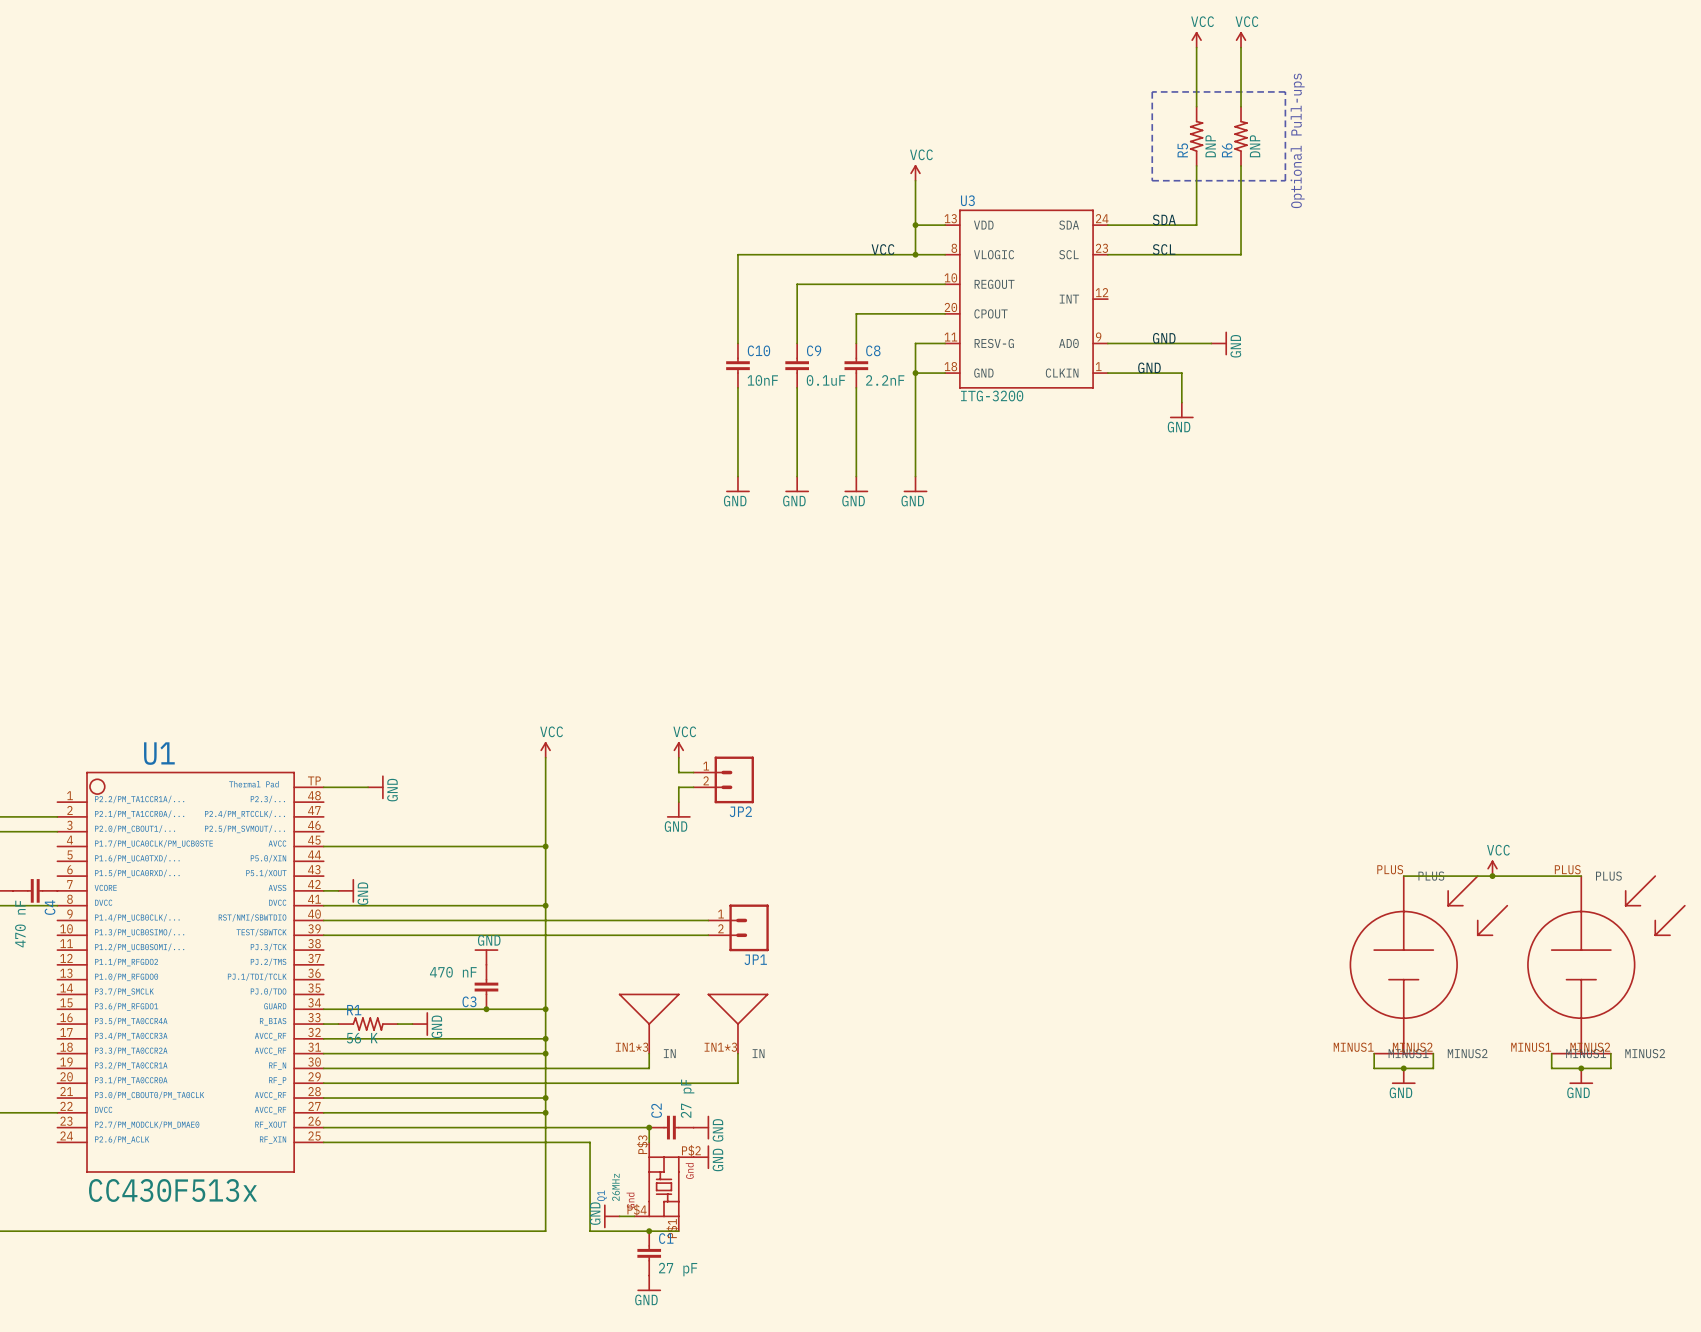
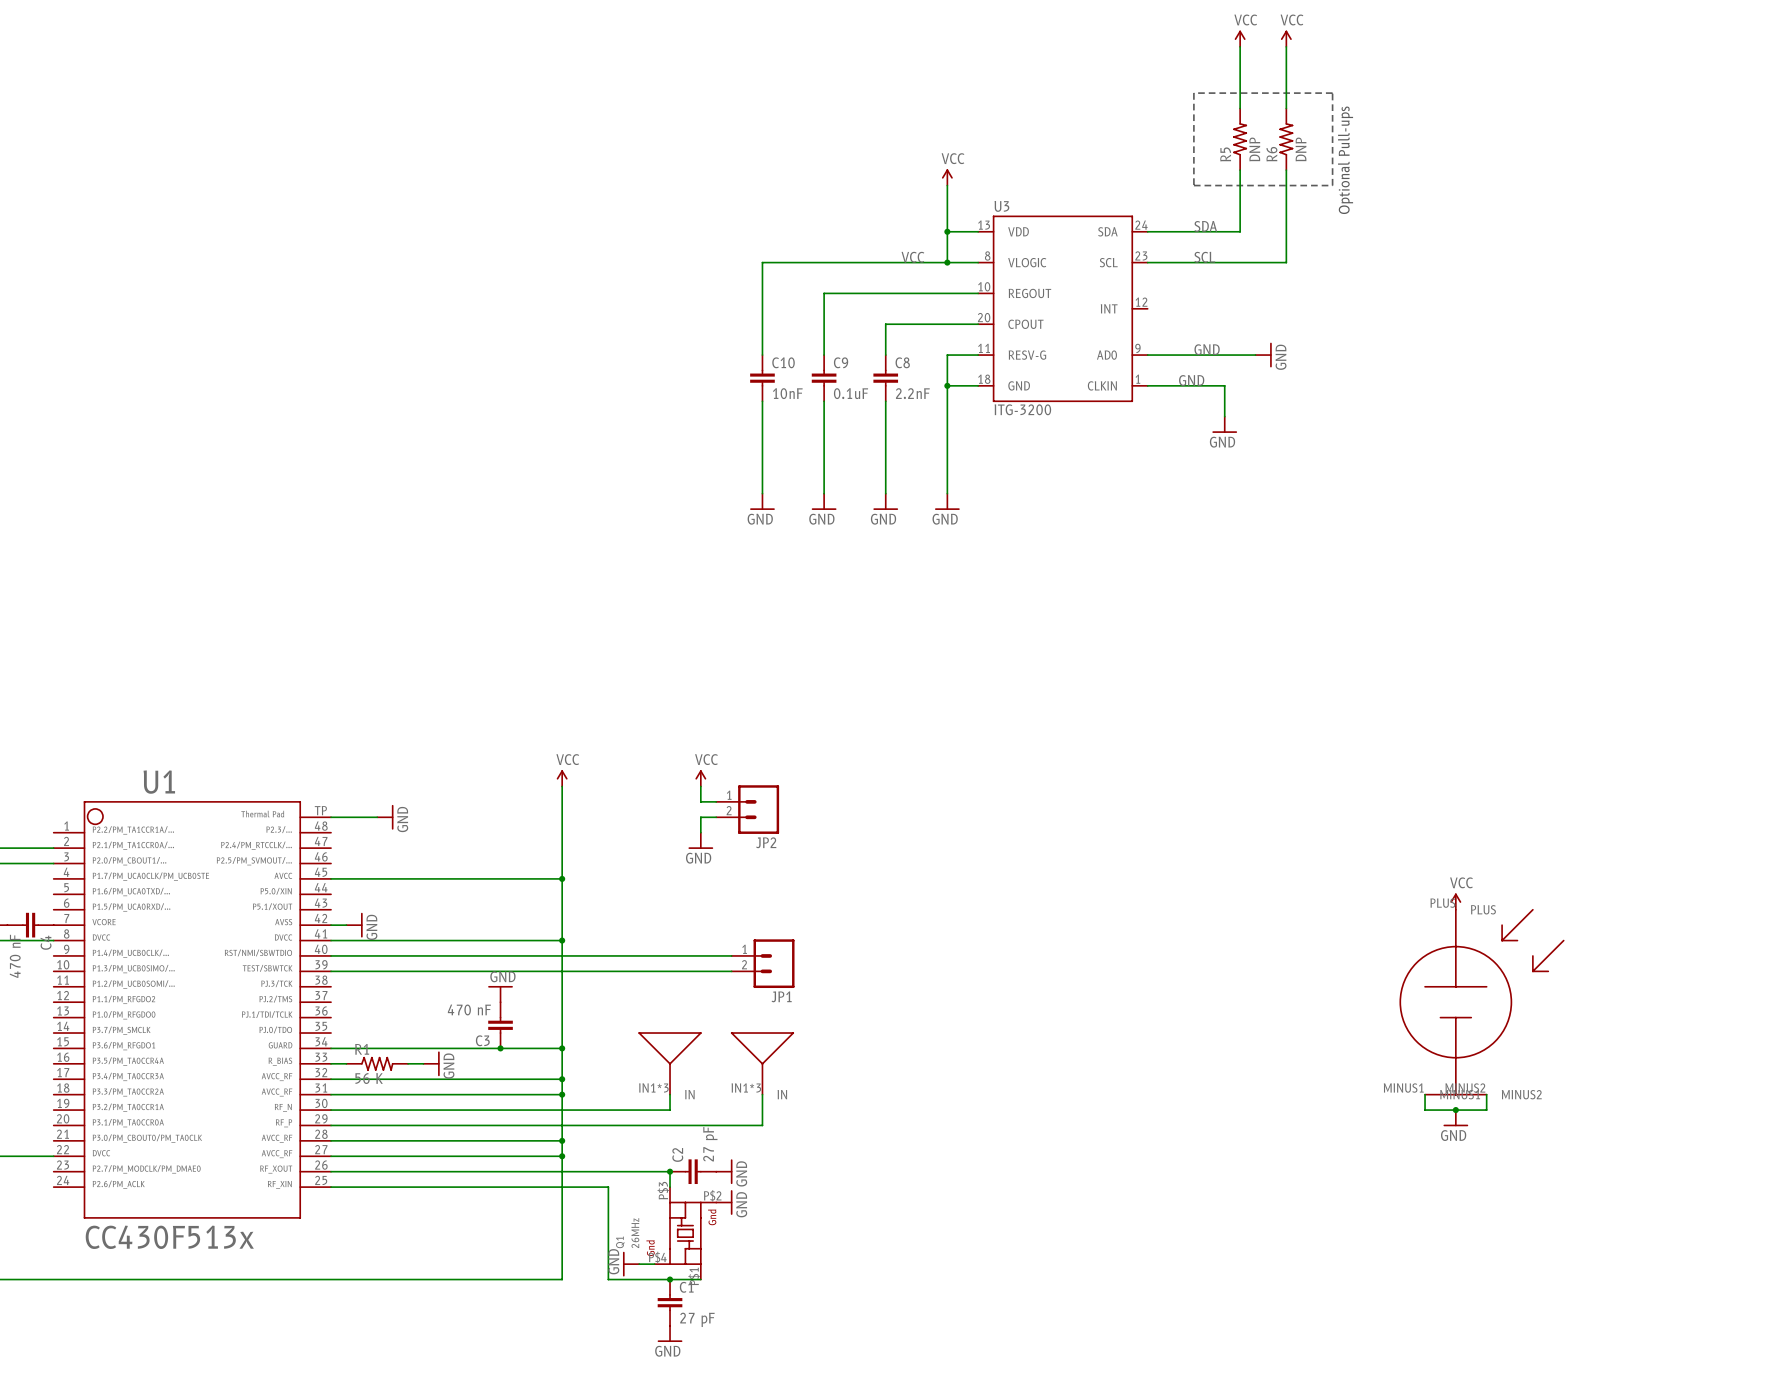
power symbol position: VCC (1492, 868) -> VCC (1455, 901)
wire: (1403, 876) (1581, 876) -> none
junction: (1492, 876) -> none
part: (1606, 964) -> none
wire: (1551, 1053) (1551, 1068) (1610, 1068) (1610, 1053) -> none
junction: (1581, 1068) -> none
power symbol: GND (1581, 1076) -> none

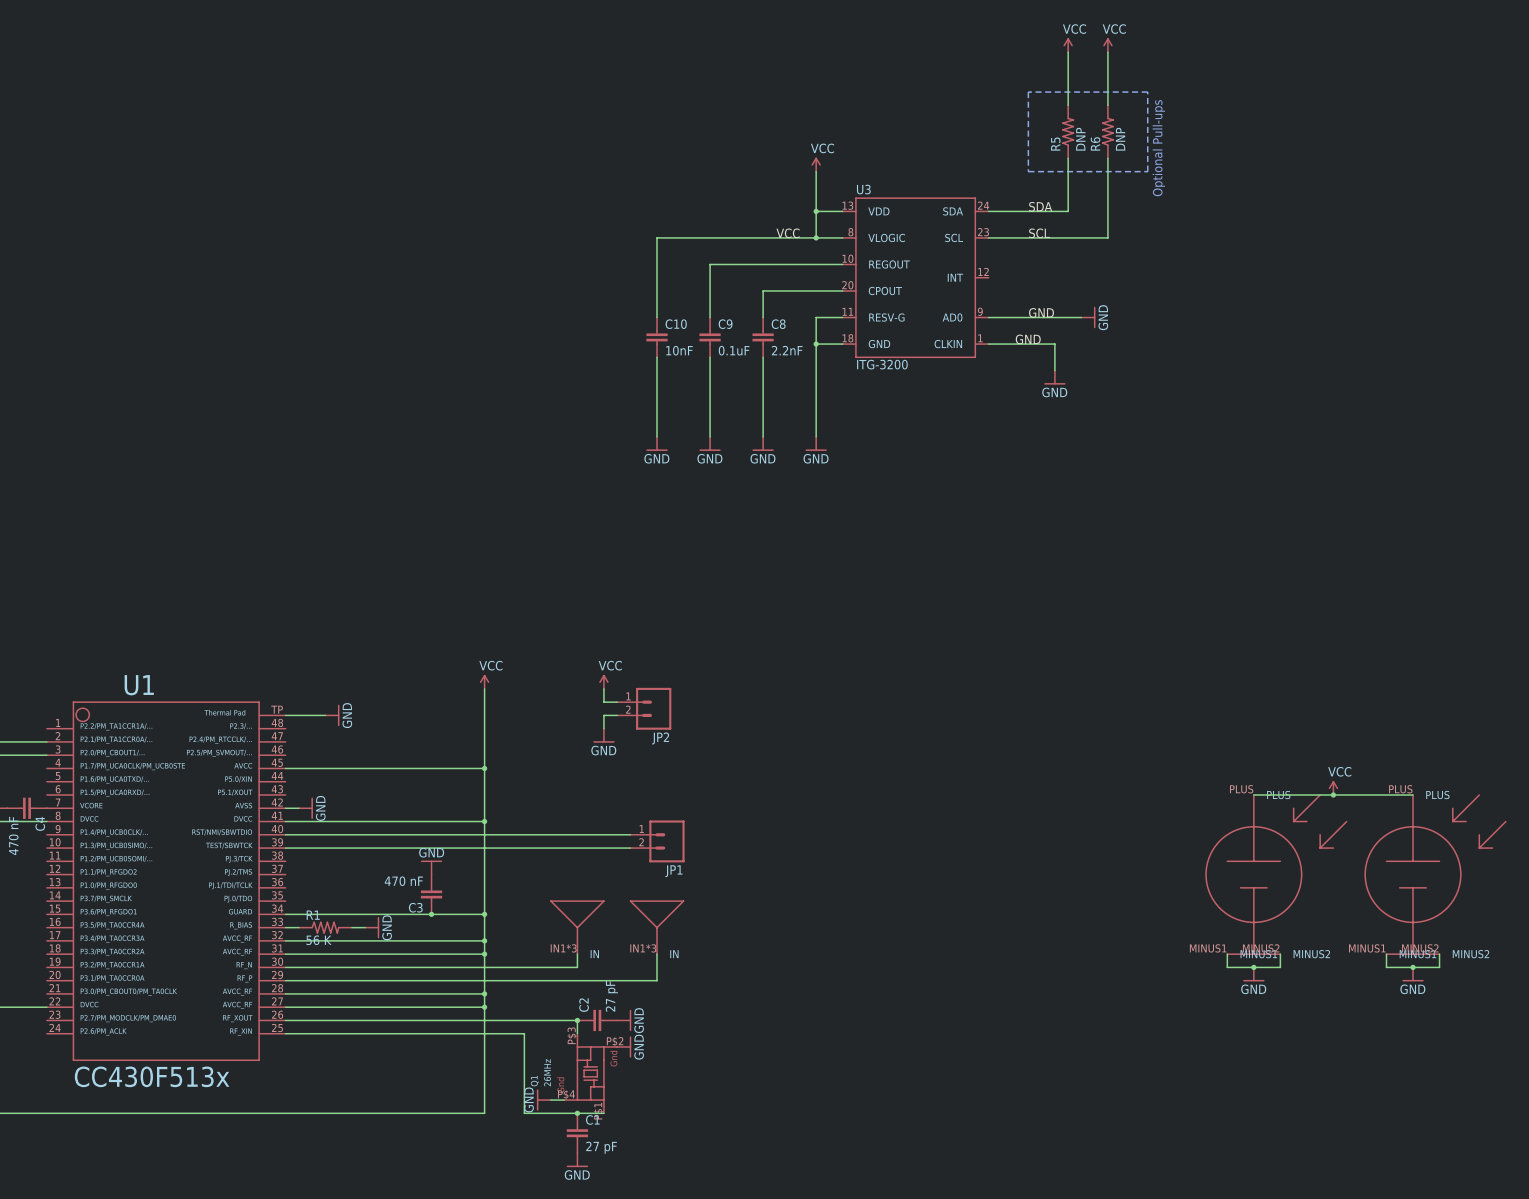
power symbol position: VCC (1455, 901) -> VCC (1333, 788)
wire: none -> (1253, 795) (1413, 795)
junction: none -> (1333, 795)
part: none -> (1435, 874)
wire: none -> (1386, 954) (1386, 967) (1439, 967) (1439, 954)
junction: none -> (1413, 967)
power symbol: none -> GND (1413, 974)

